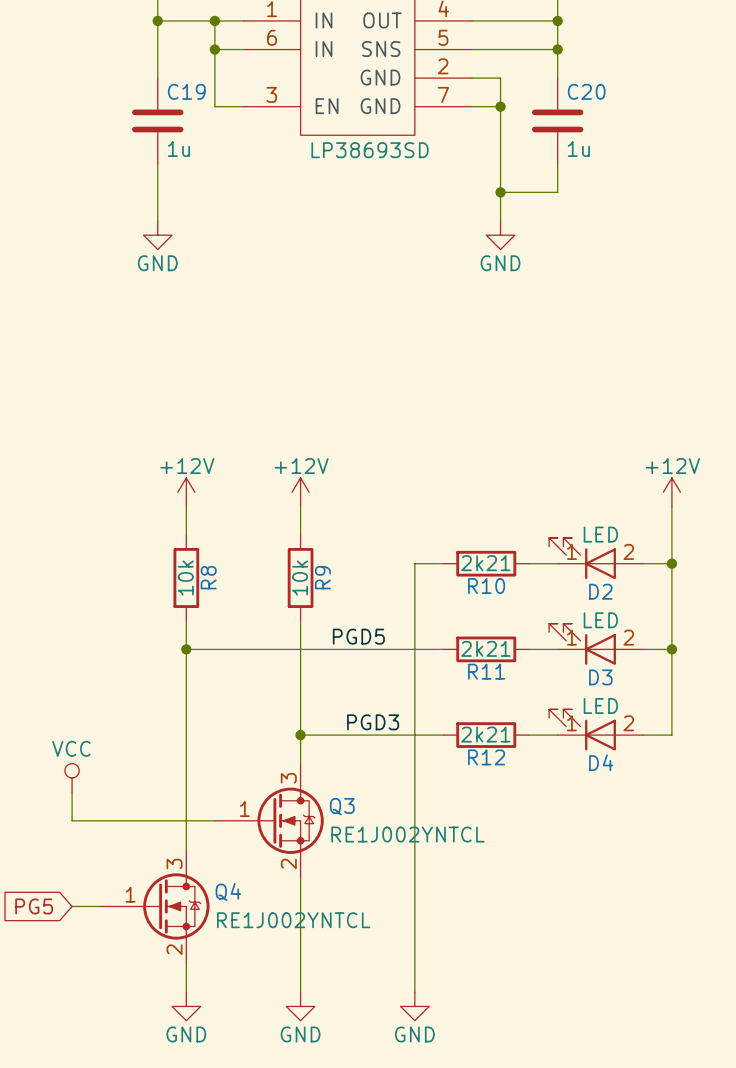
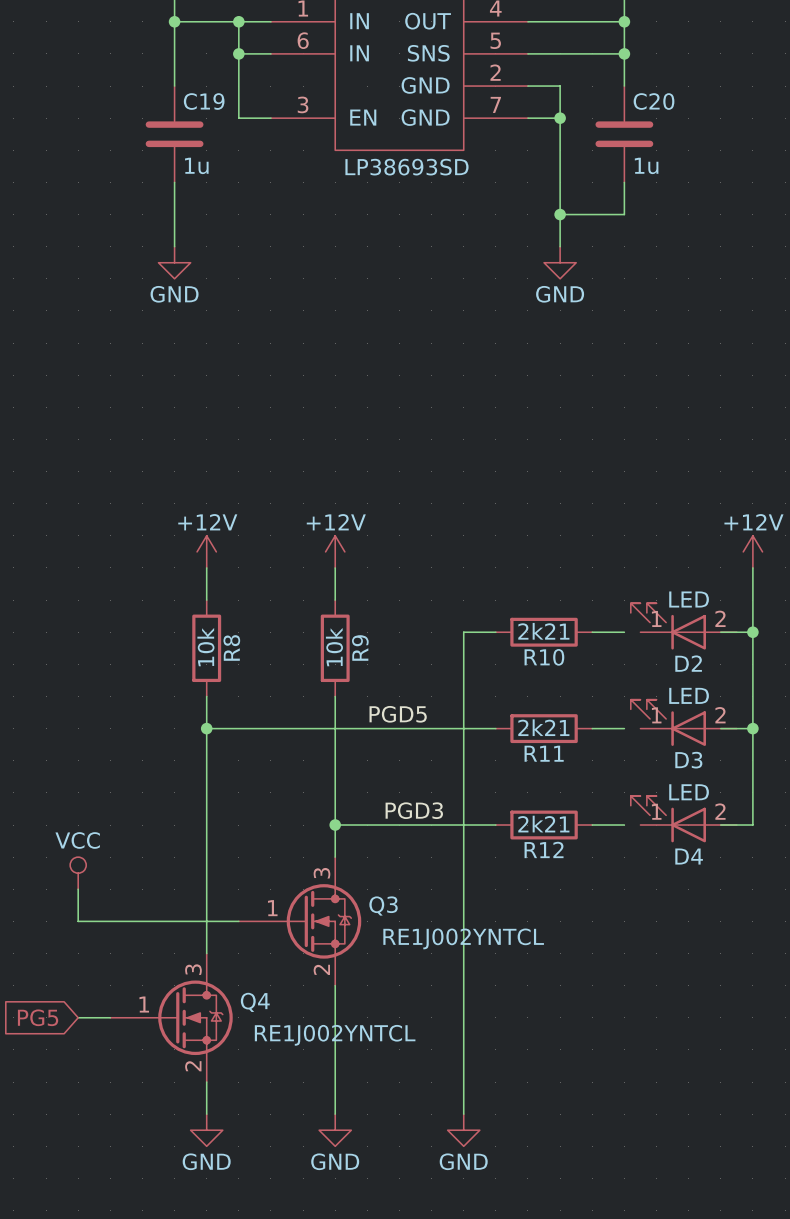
D2 position: (596, 558) -> (683, 626)
D3 position: (596, 644) -> (683, 722)
D4 position: (596, 729) -> (683, 819)

